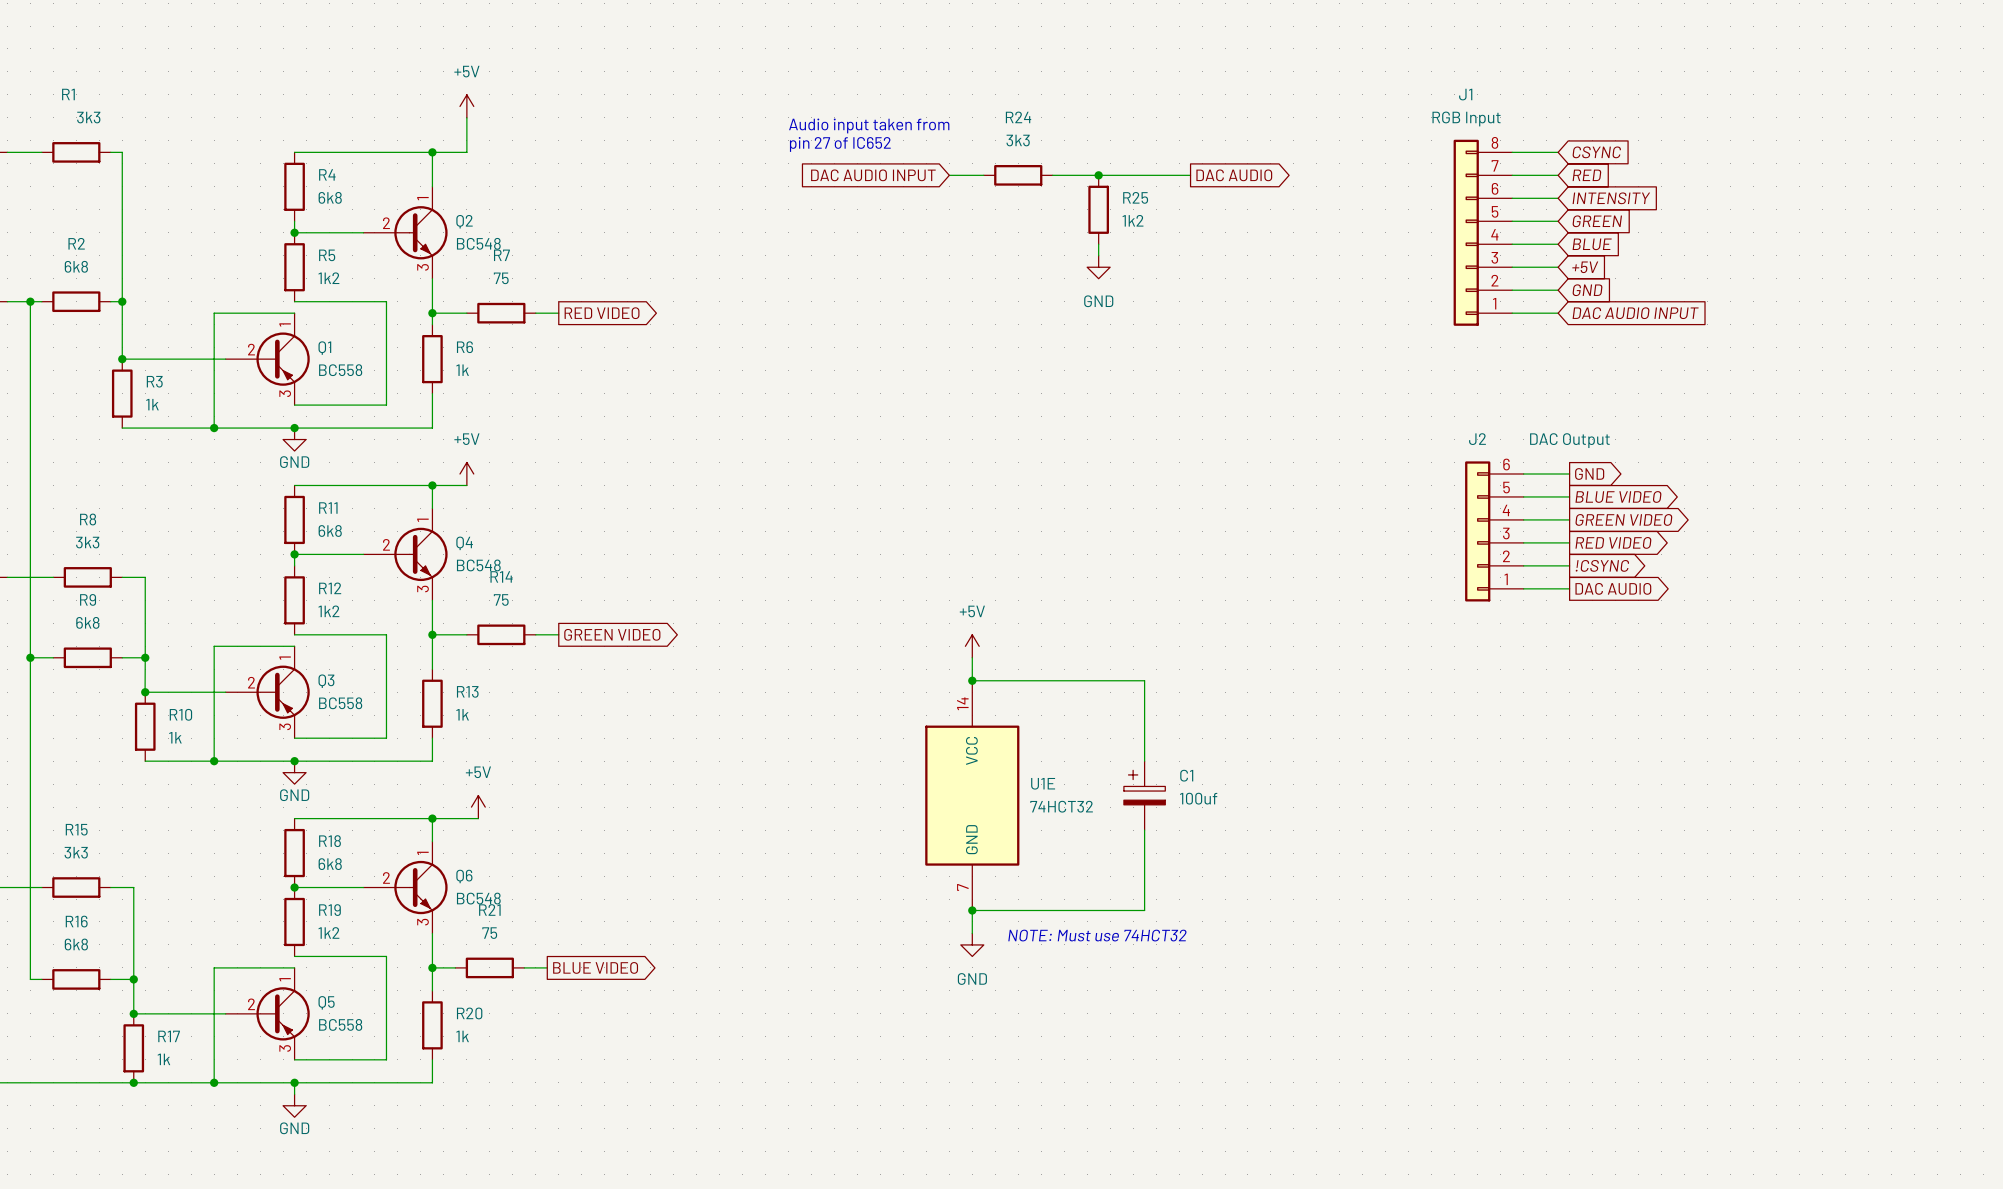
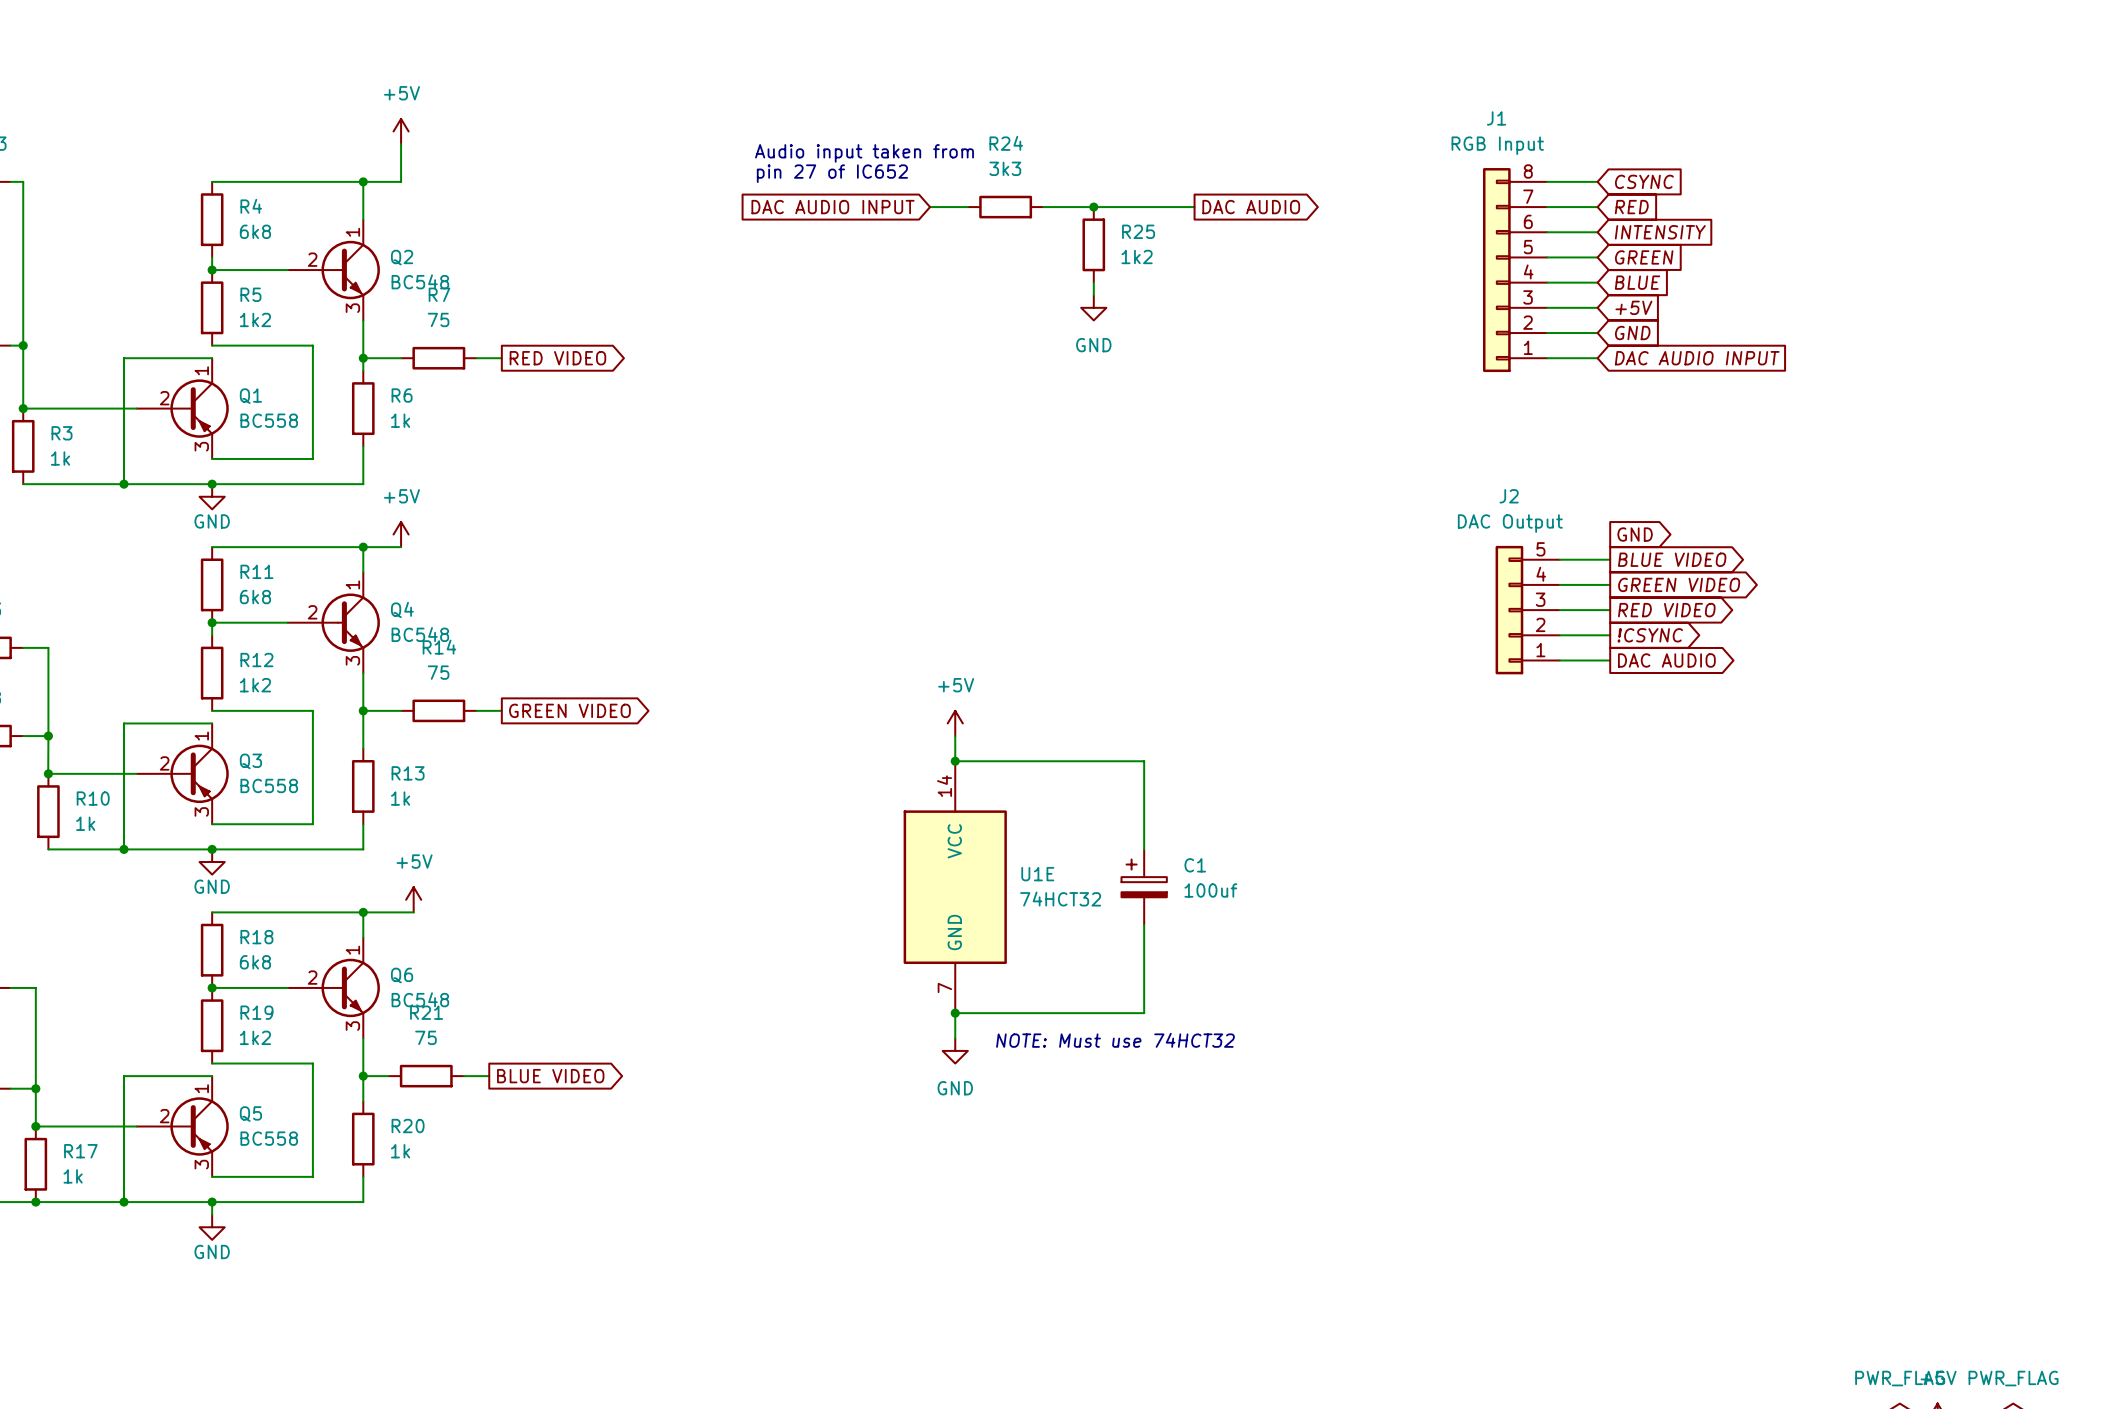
J2 value position: DAC Output (1569, 440) -> DAC Output (1510, 523)
J2 symbol: [1465, 461, 1524, 602] -> [1495, 545, 1560, 675]
wire: (1523, 473) (1569, 473) -> none

